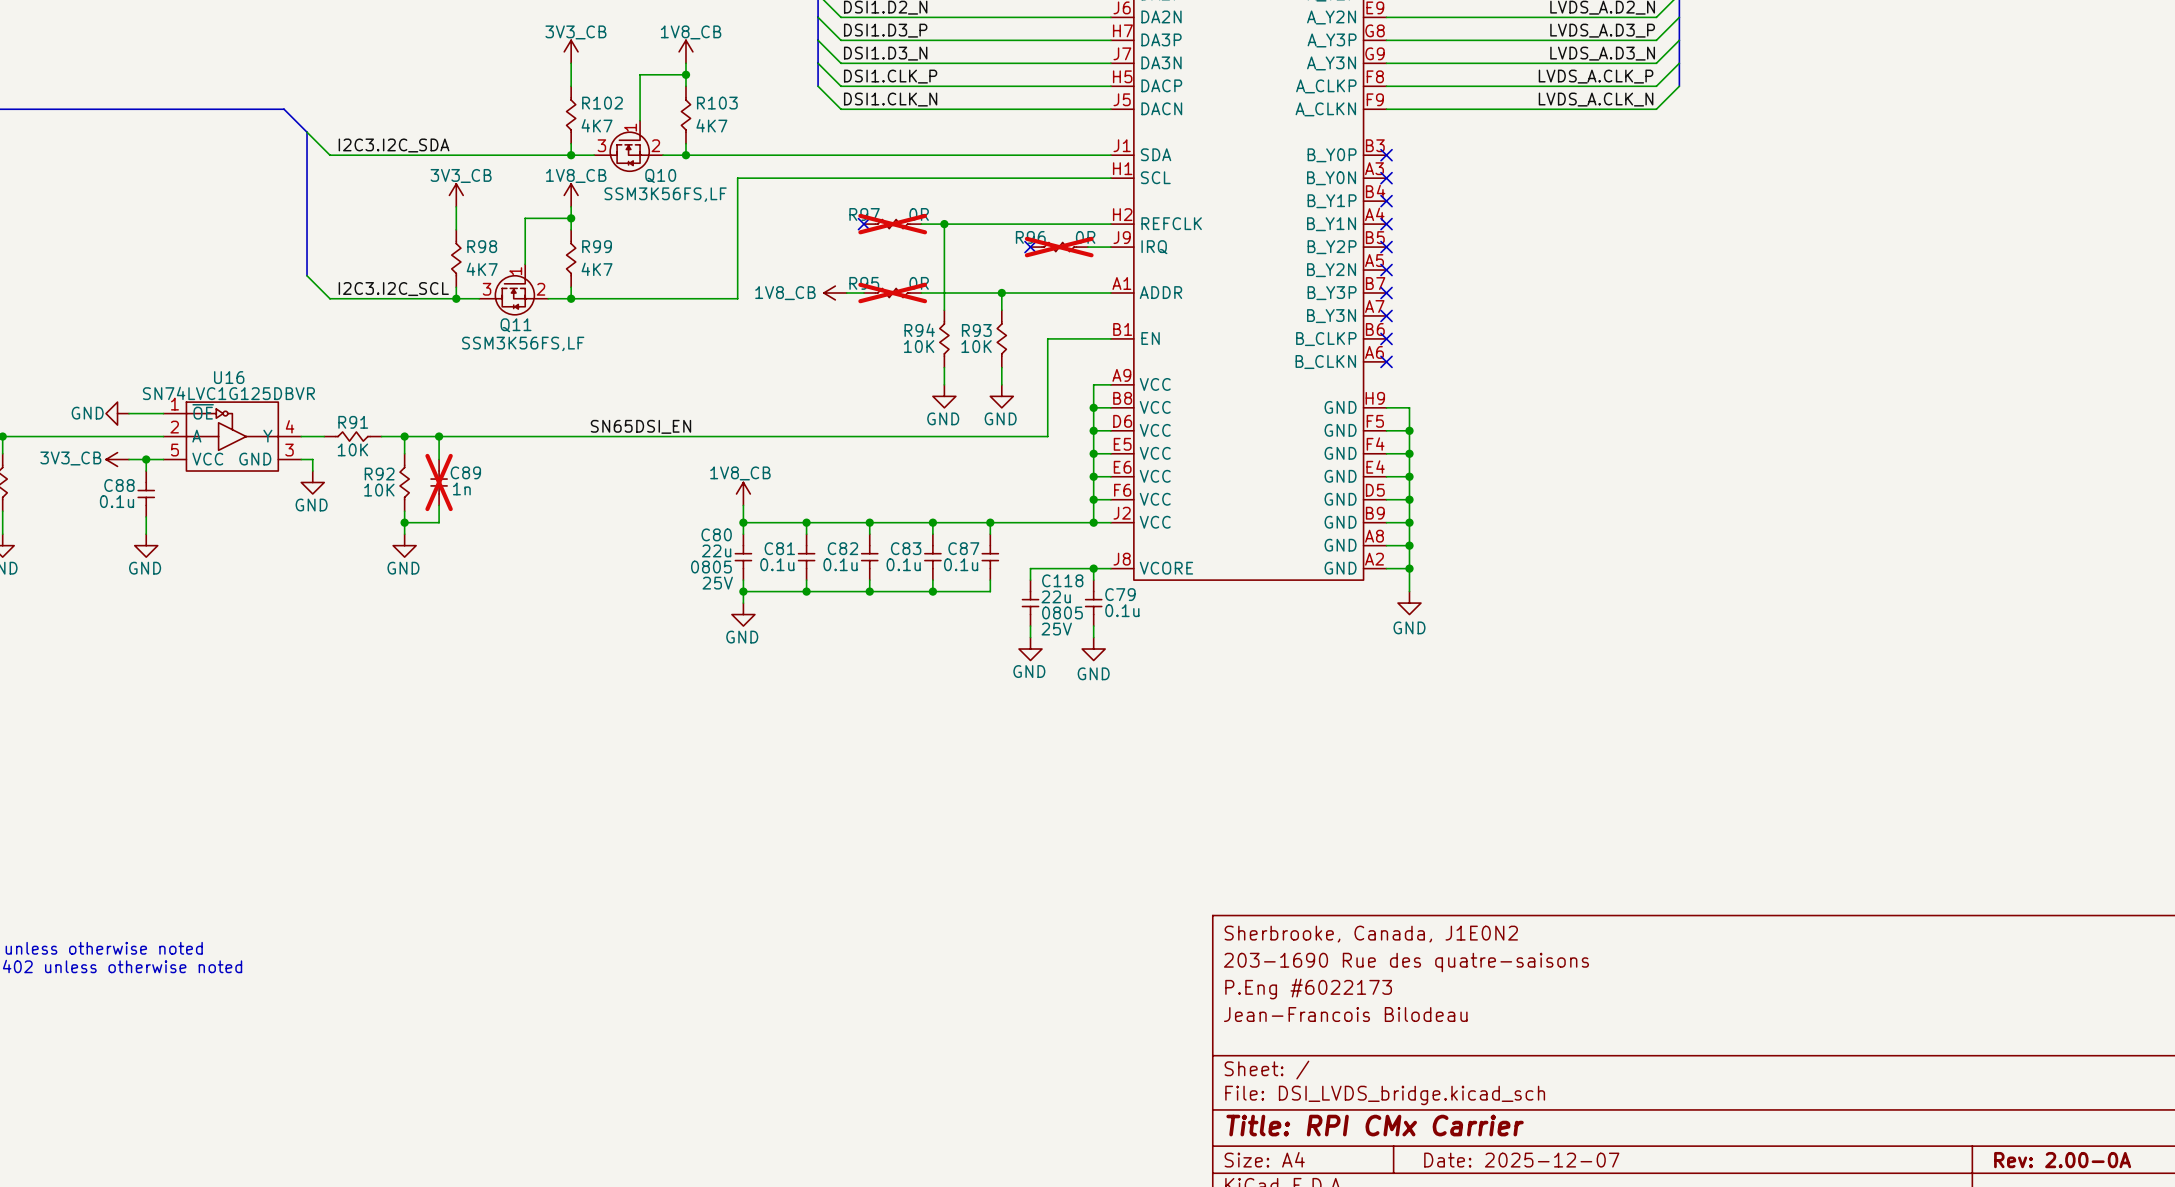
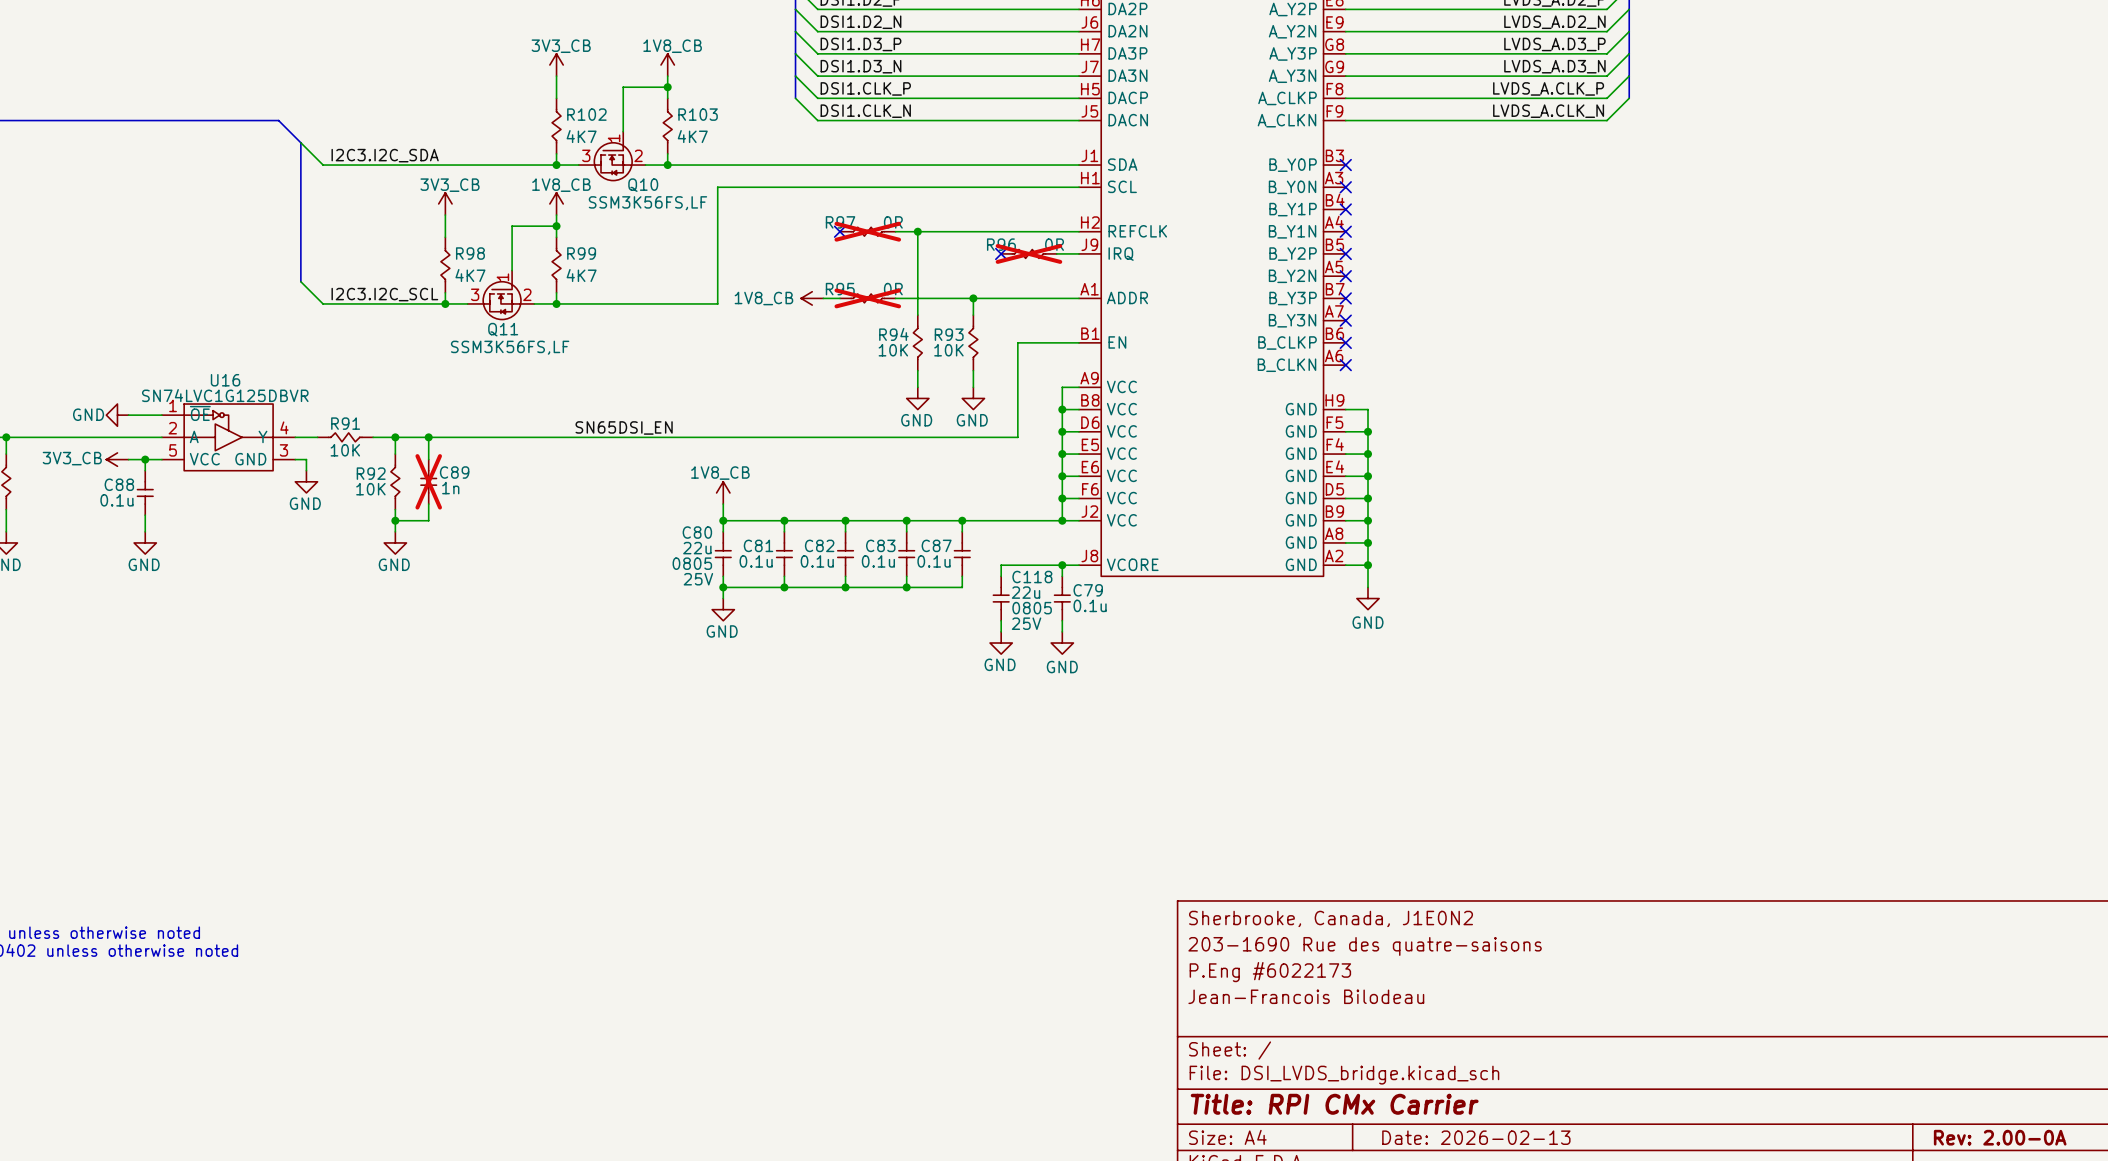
title block: Date: 2025-12-07 (1521, 1160) -> Date: 2026-02-13 (1476, 1137)

